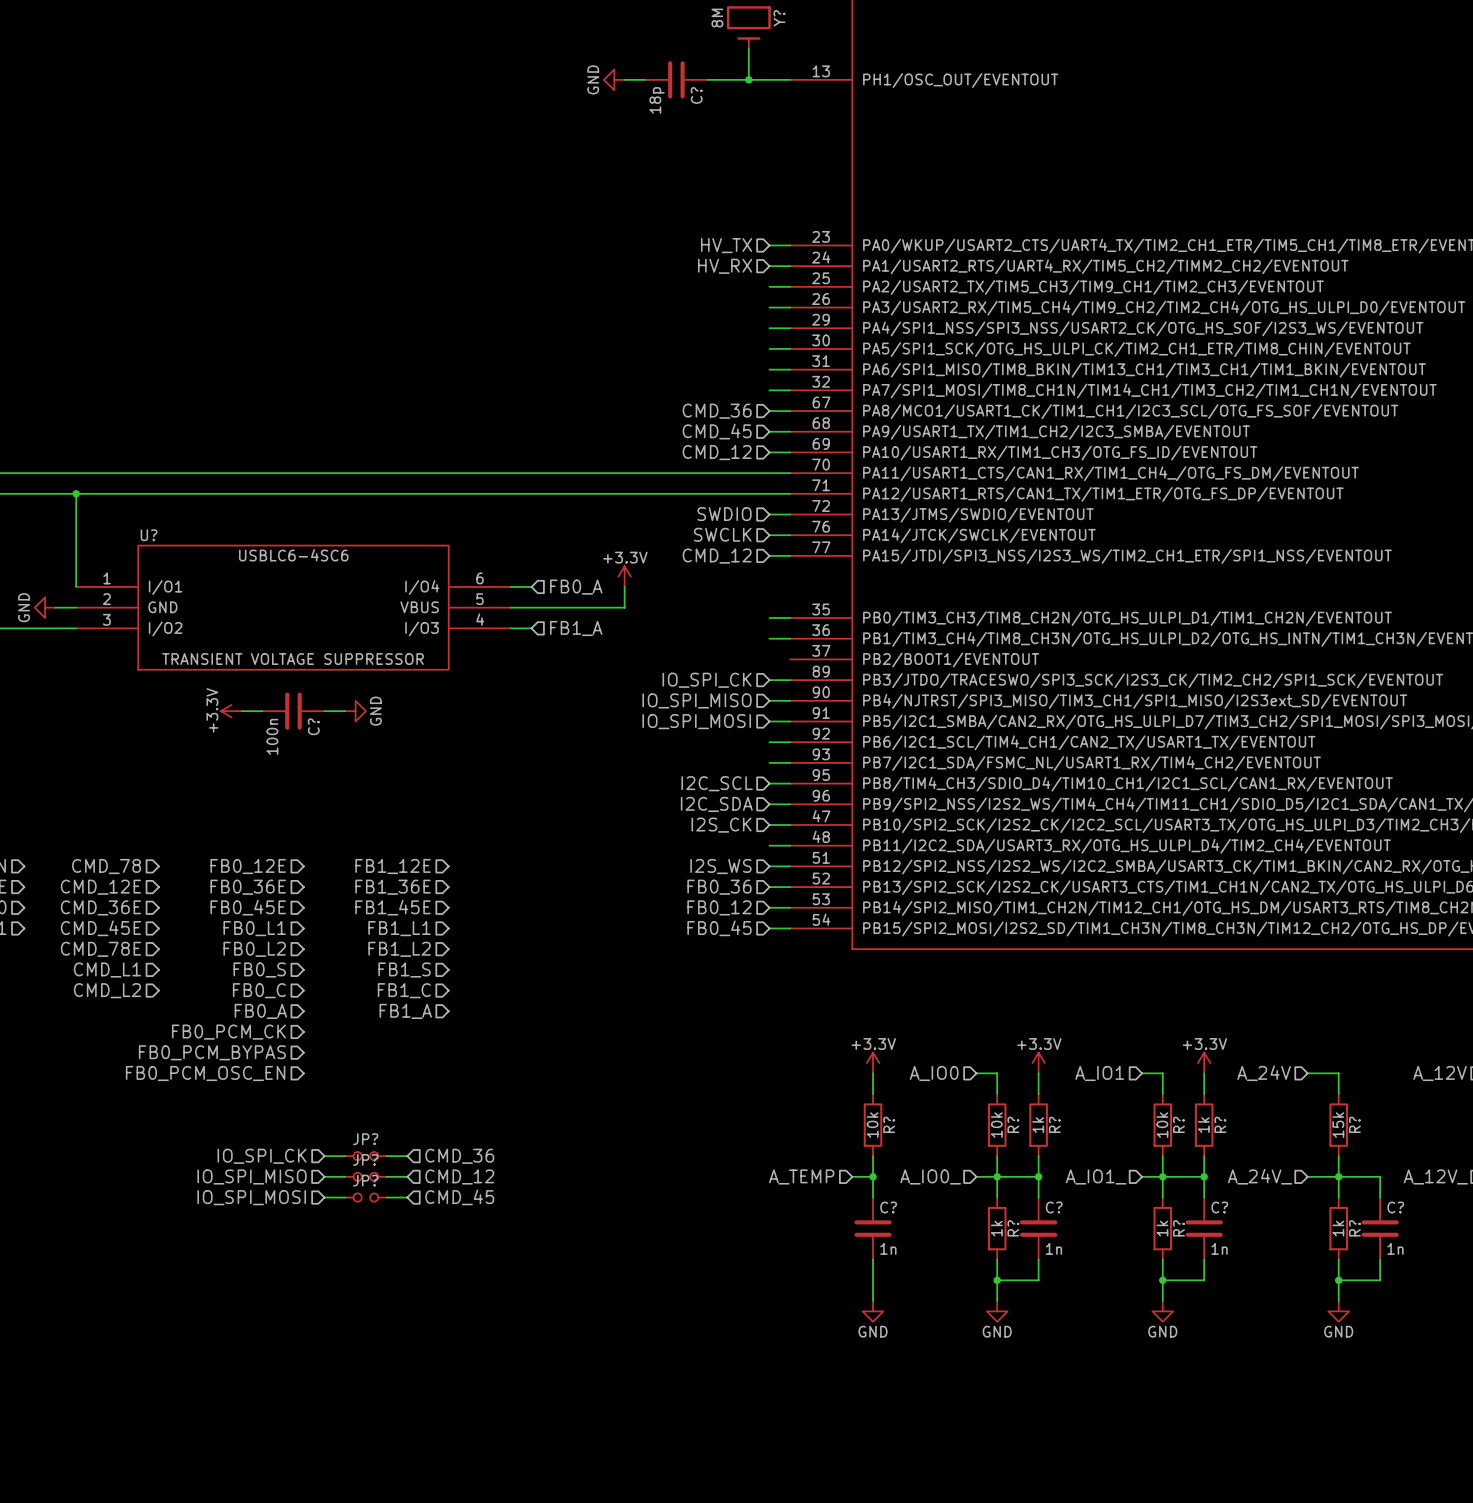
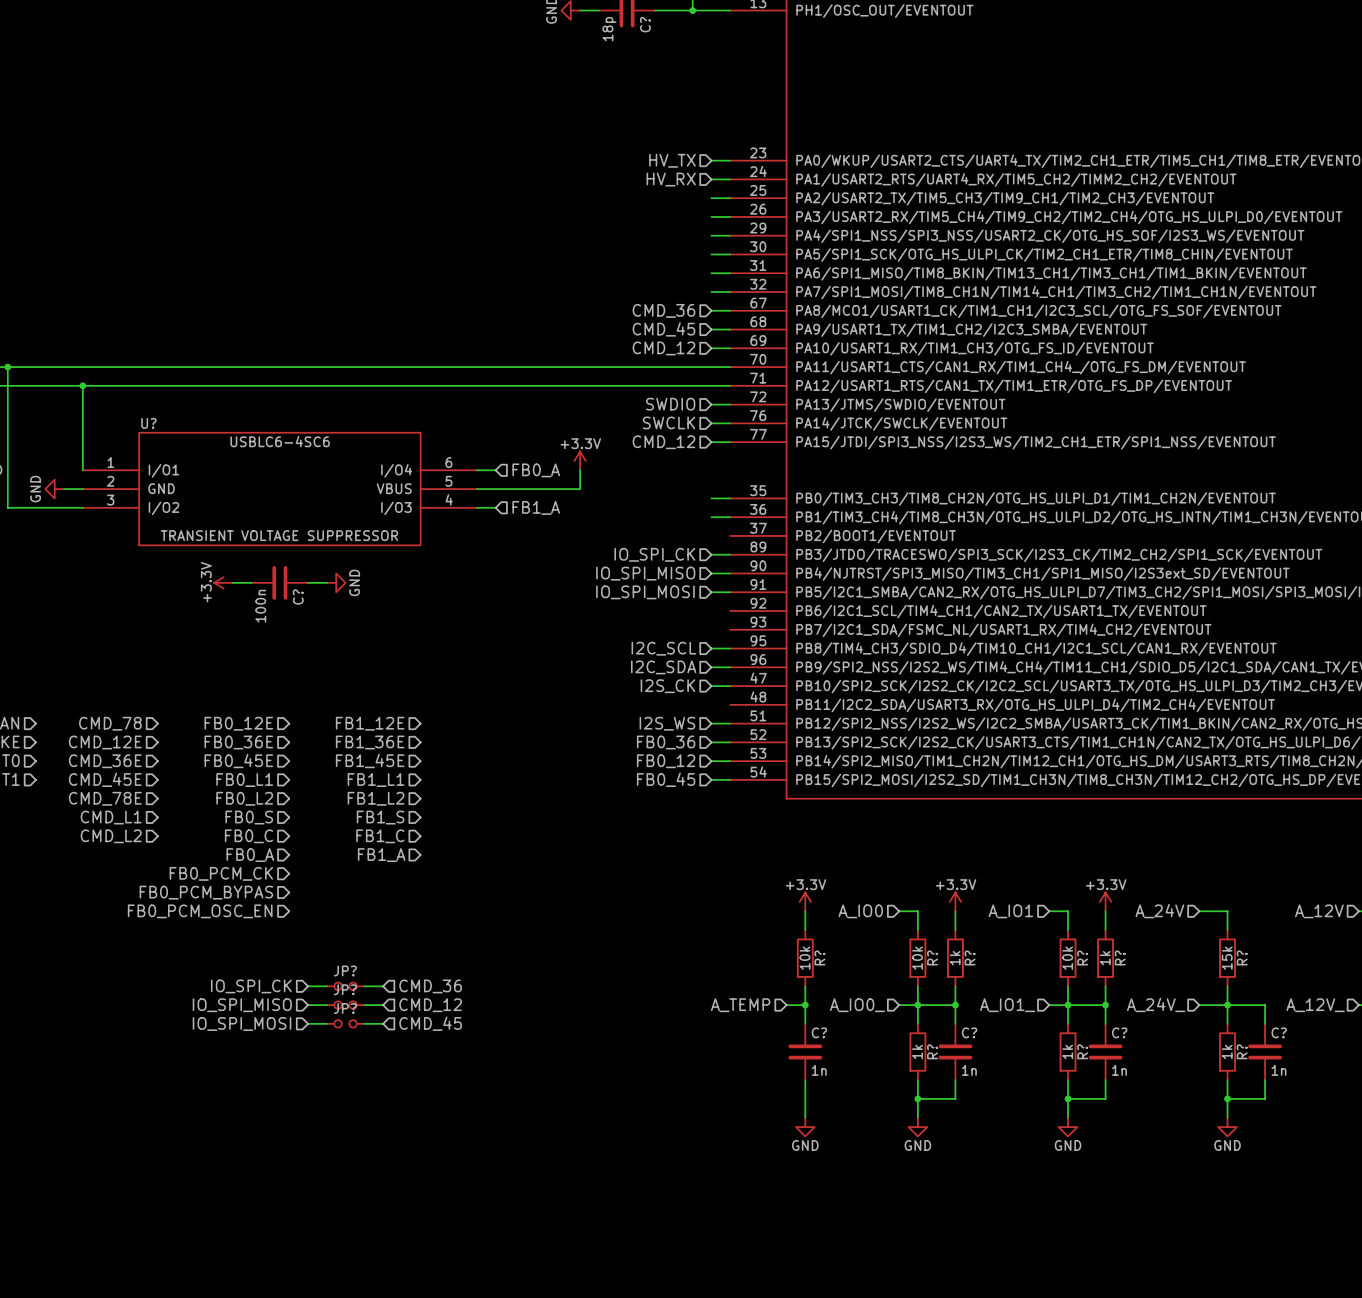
wire: (769, 742) (790, 742) -> none
wire: (769, 762) (790, 762) -> none
wire: (769, 845) (790, 845) -> none

